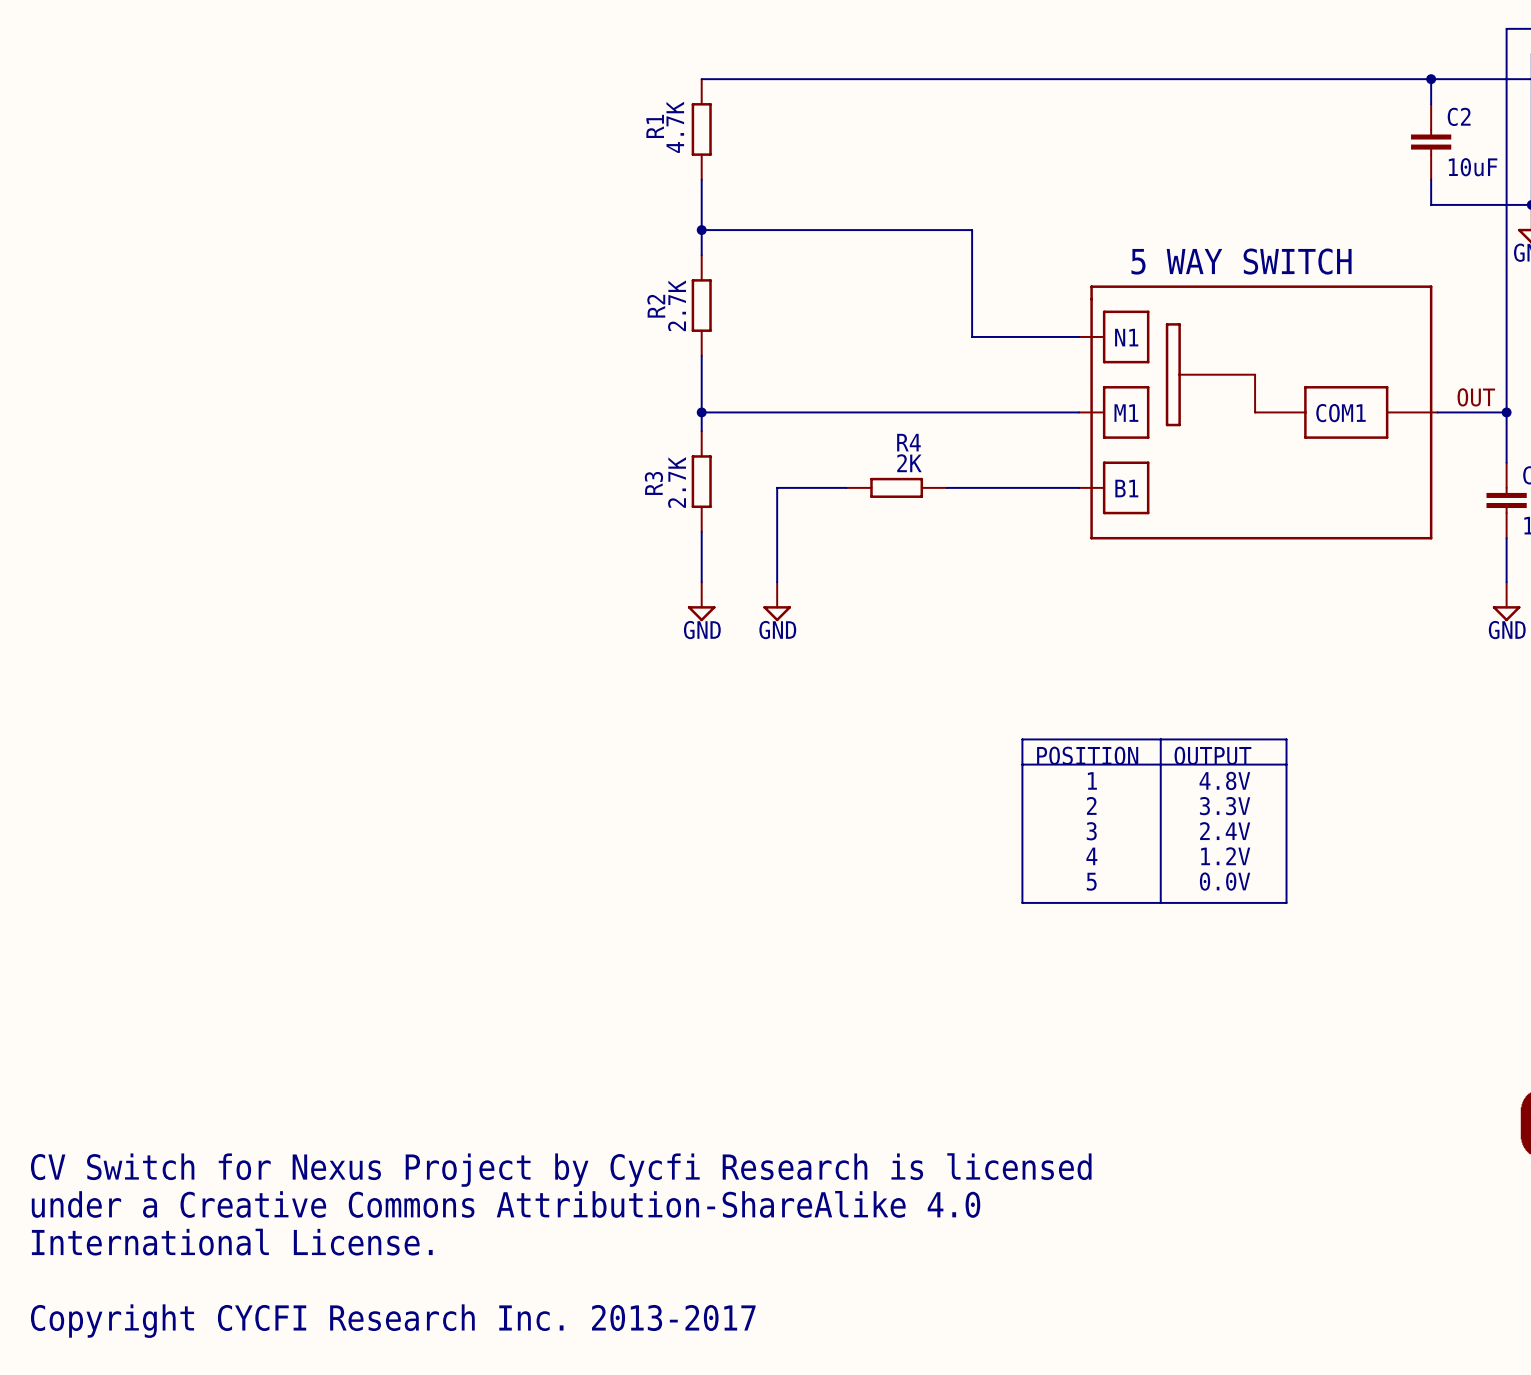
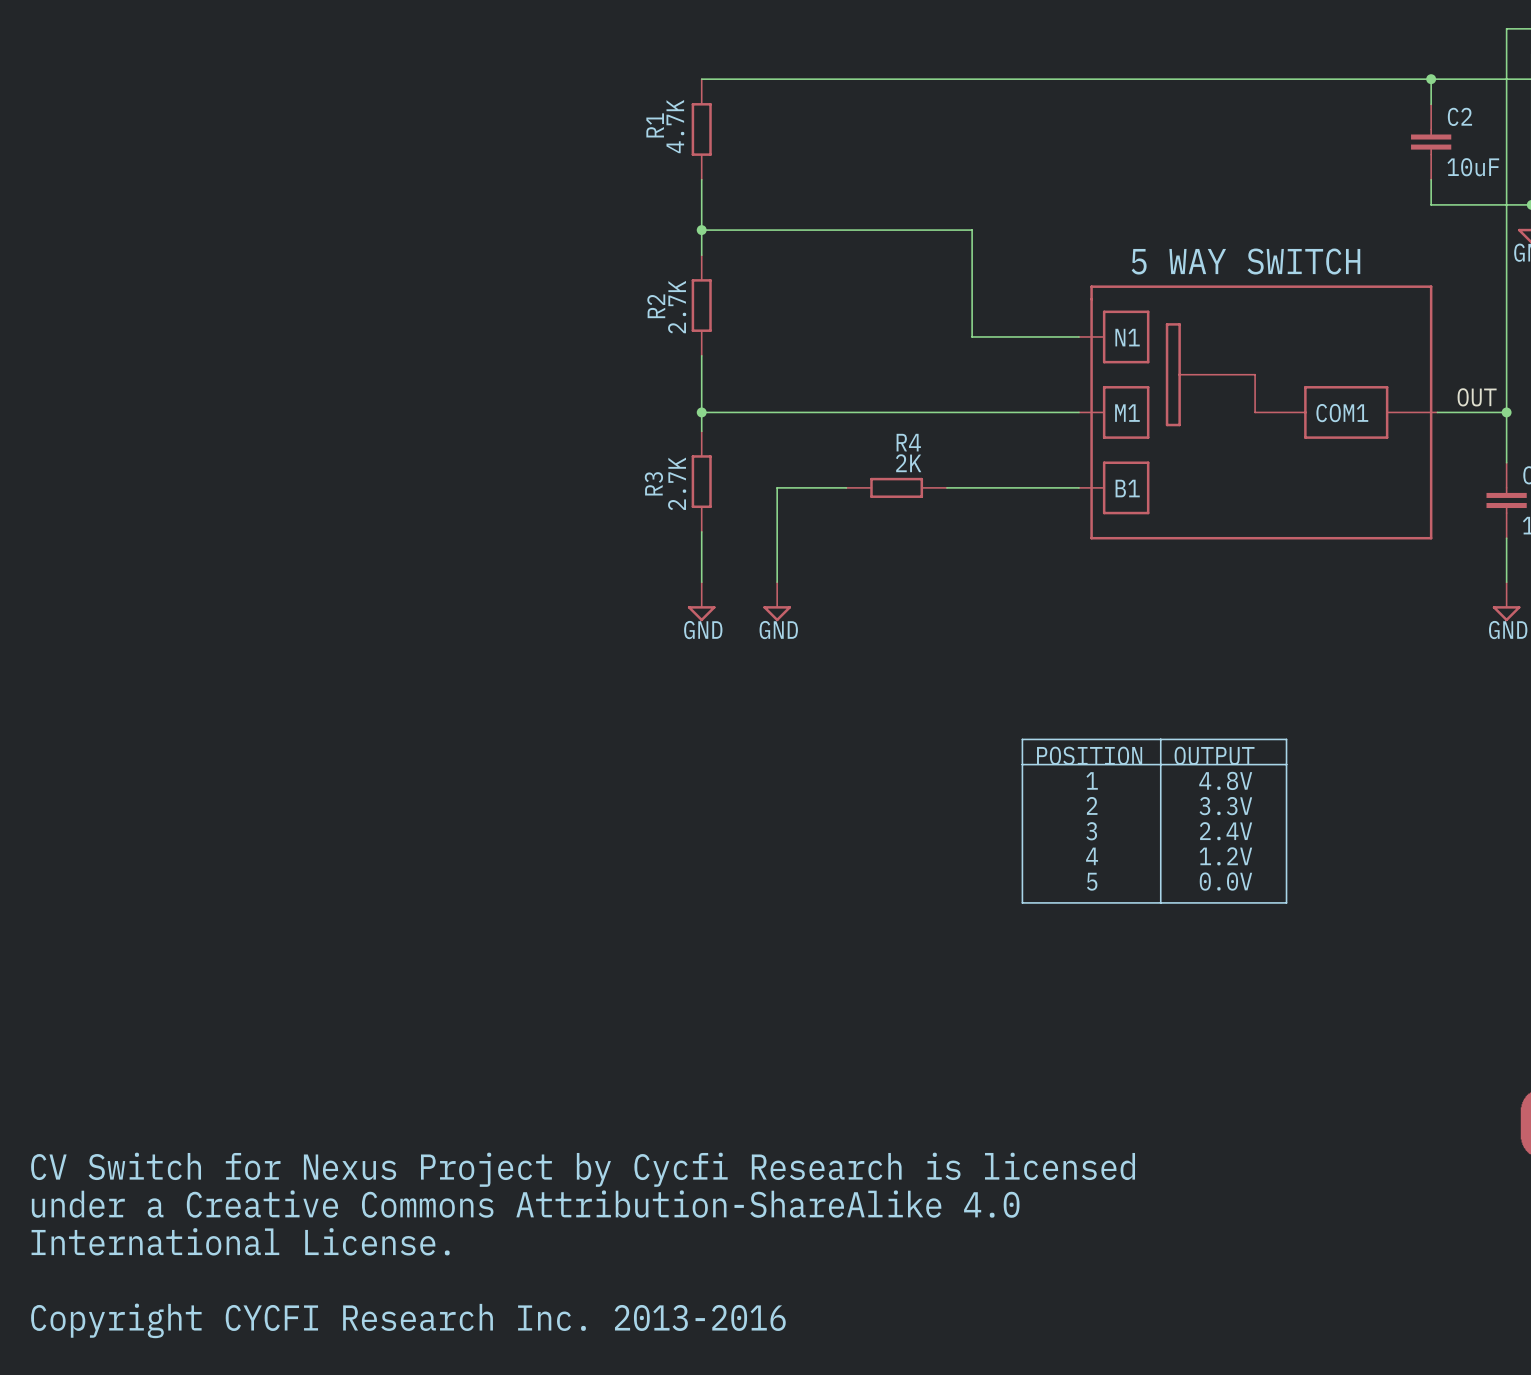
text: Copyright CYCFI Research Inc. 2013-2017 (393, 1321) -> Copyright CYCFI Research Inc. 2013-2016 (408, 1320)

